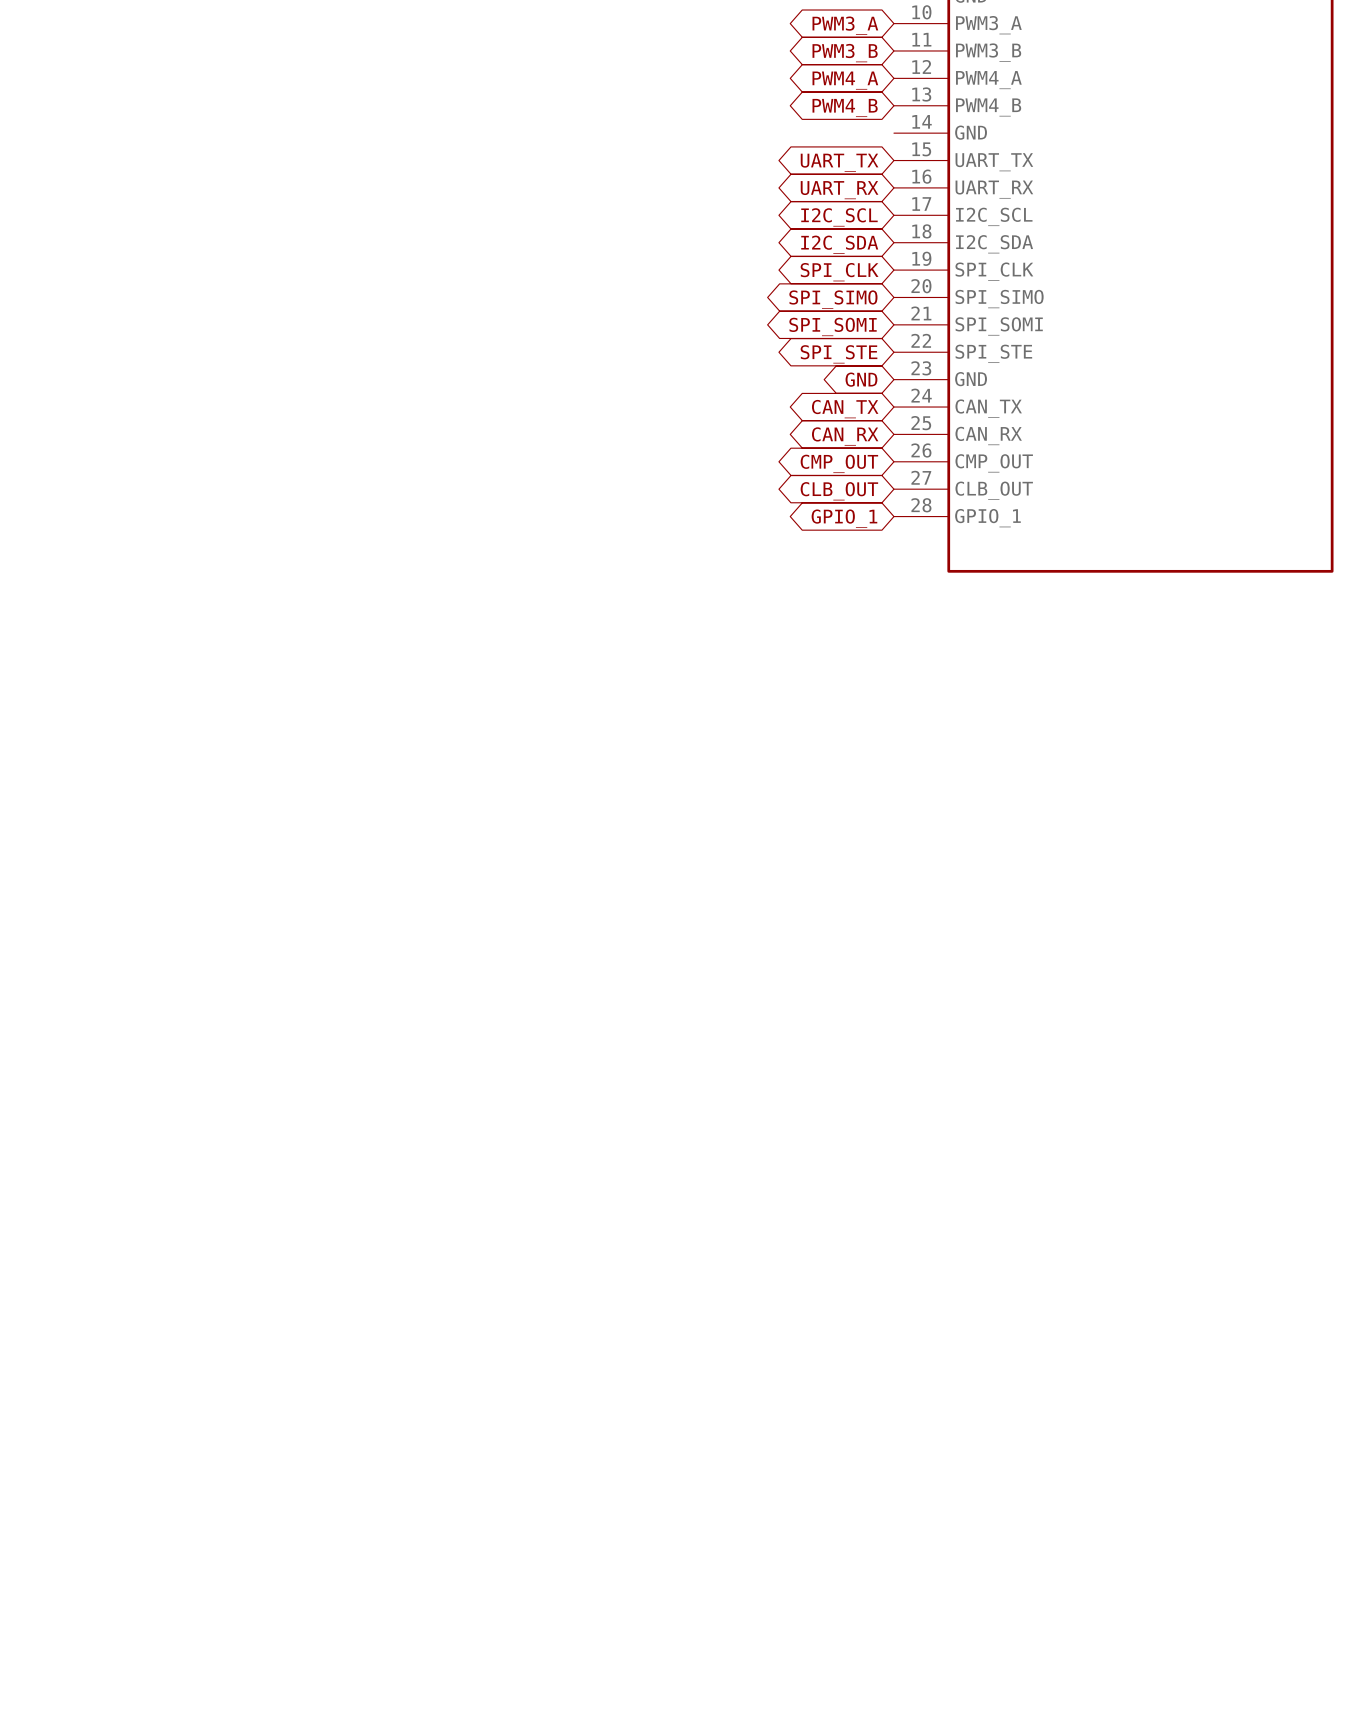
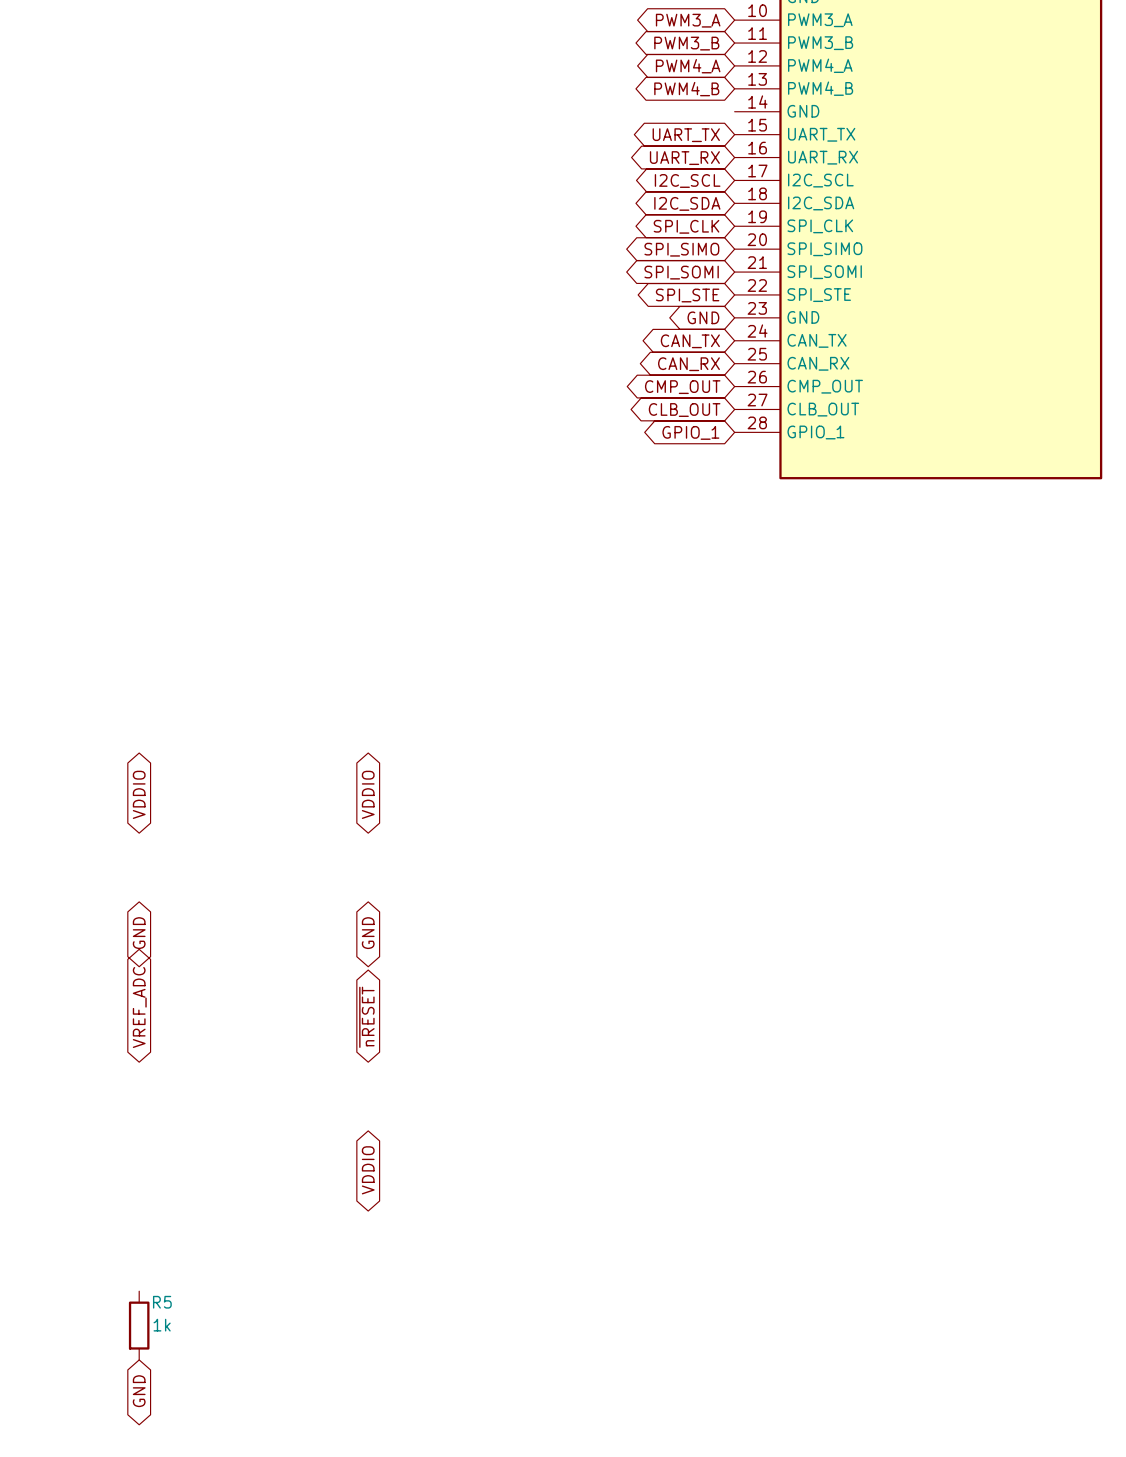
global label: none -> VDDIO (139, 794)
global label: none -> VDDIO (368, 794)
global label: none -> GND (139, 933)
global label: none -> GND (368, 933)
global label: none -> VREF_ADC (139, 1007)
global label: none -> ~{nRESET} (366, 1017)
global label: none -> VDDIO (368, 1170)
R5: none -> 1k (139, 1325)
global label: none -> GND (139, 1391)

